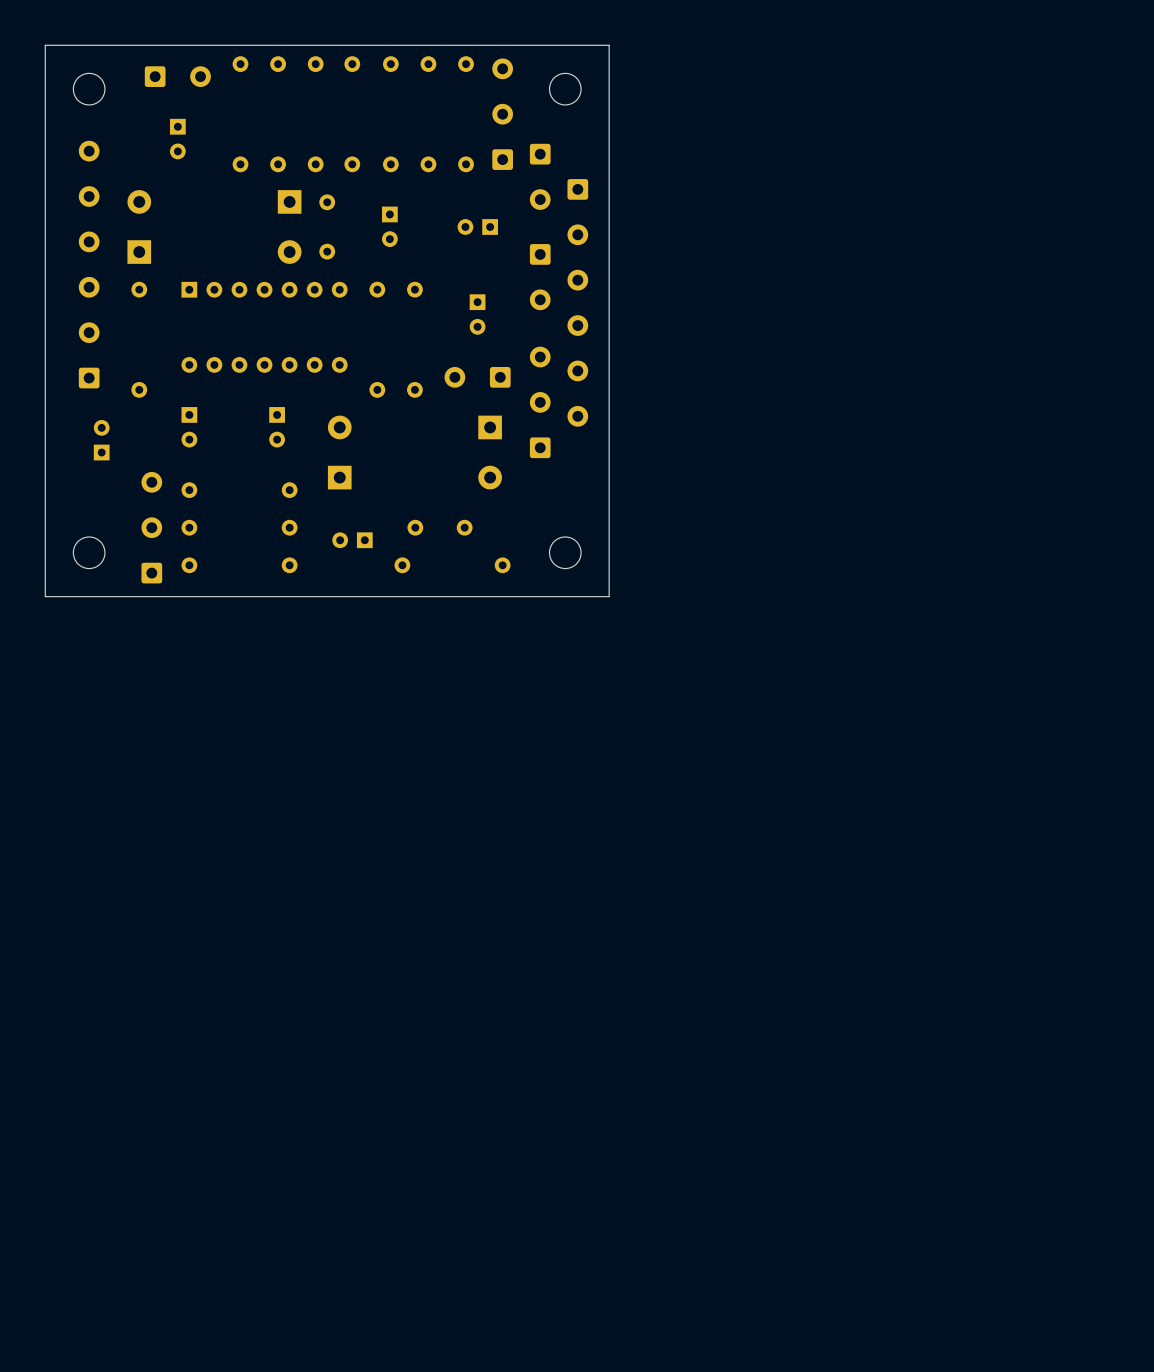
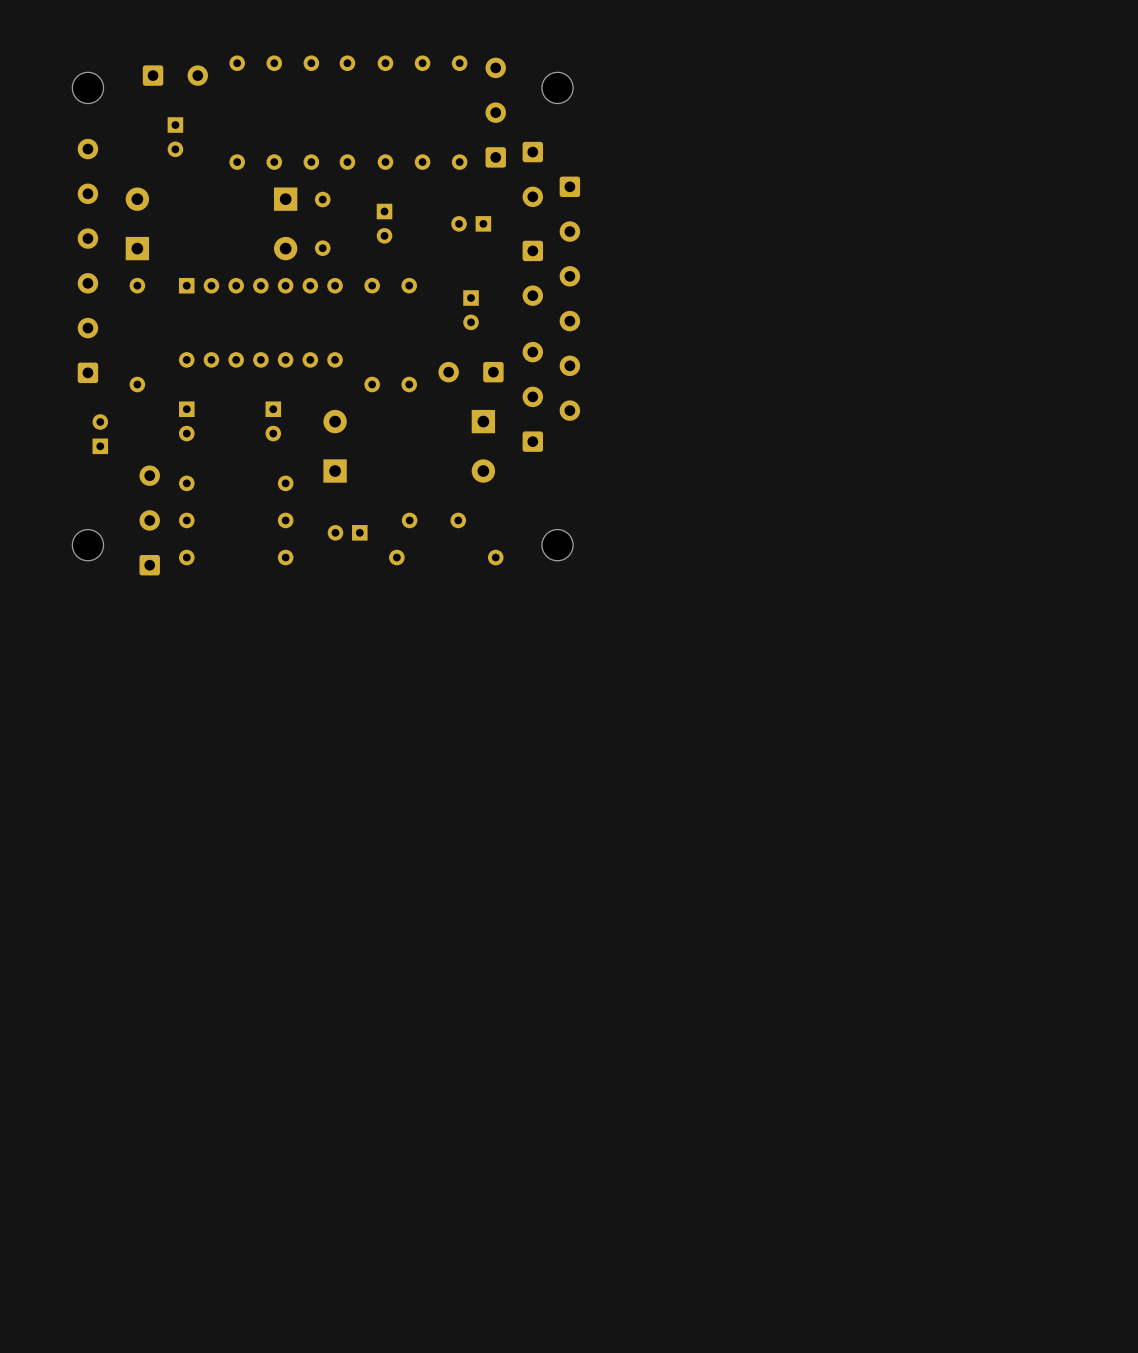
board edge: (609, 45) (45, 45) (45, 596) (609, 596) (609, 45) -> none

